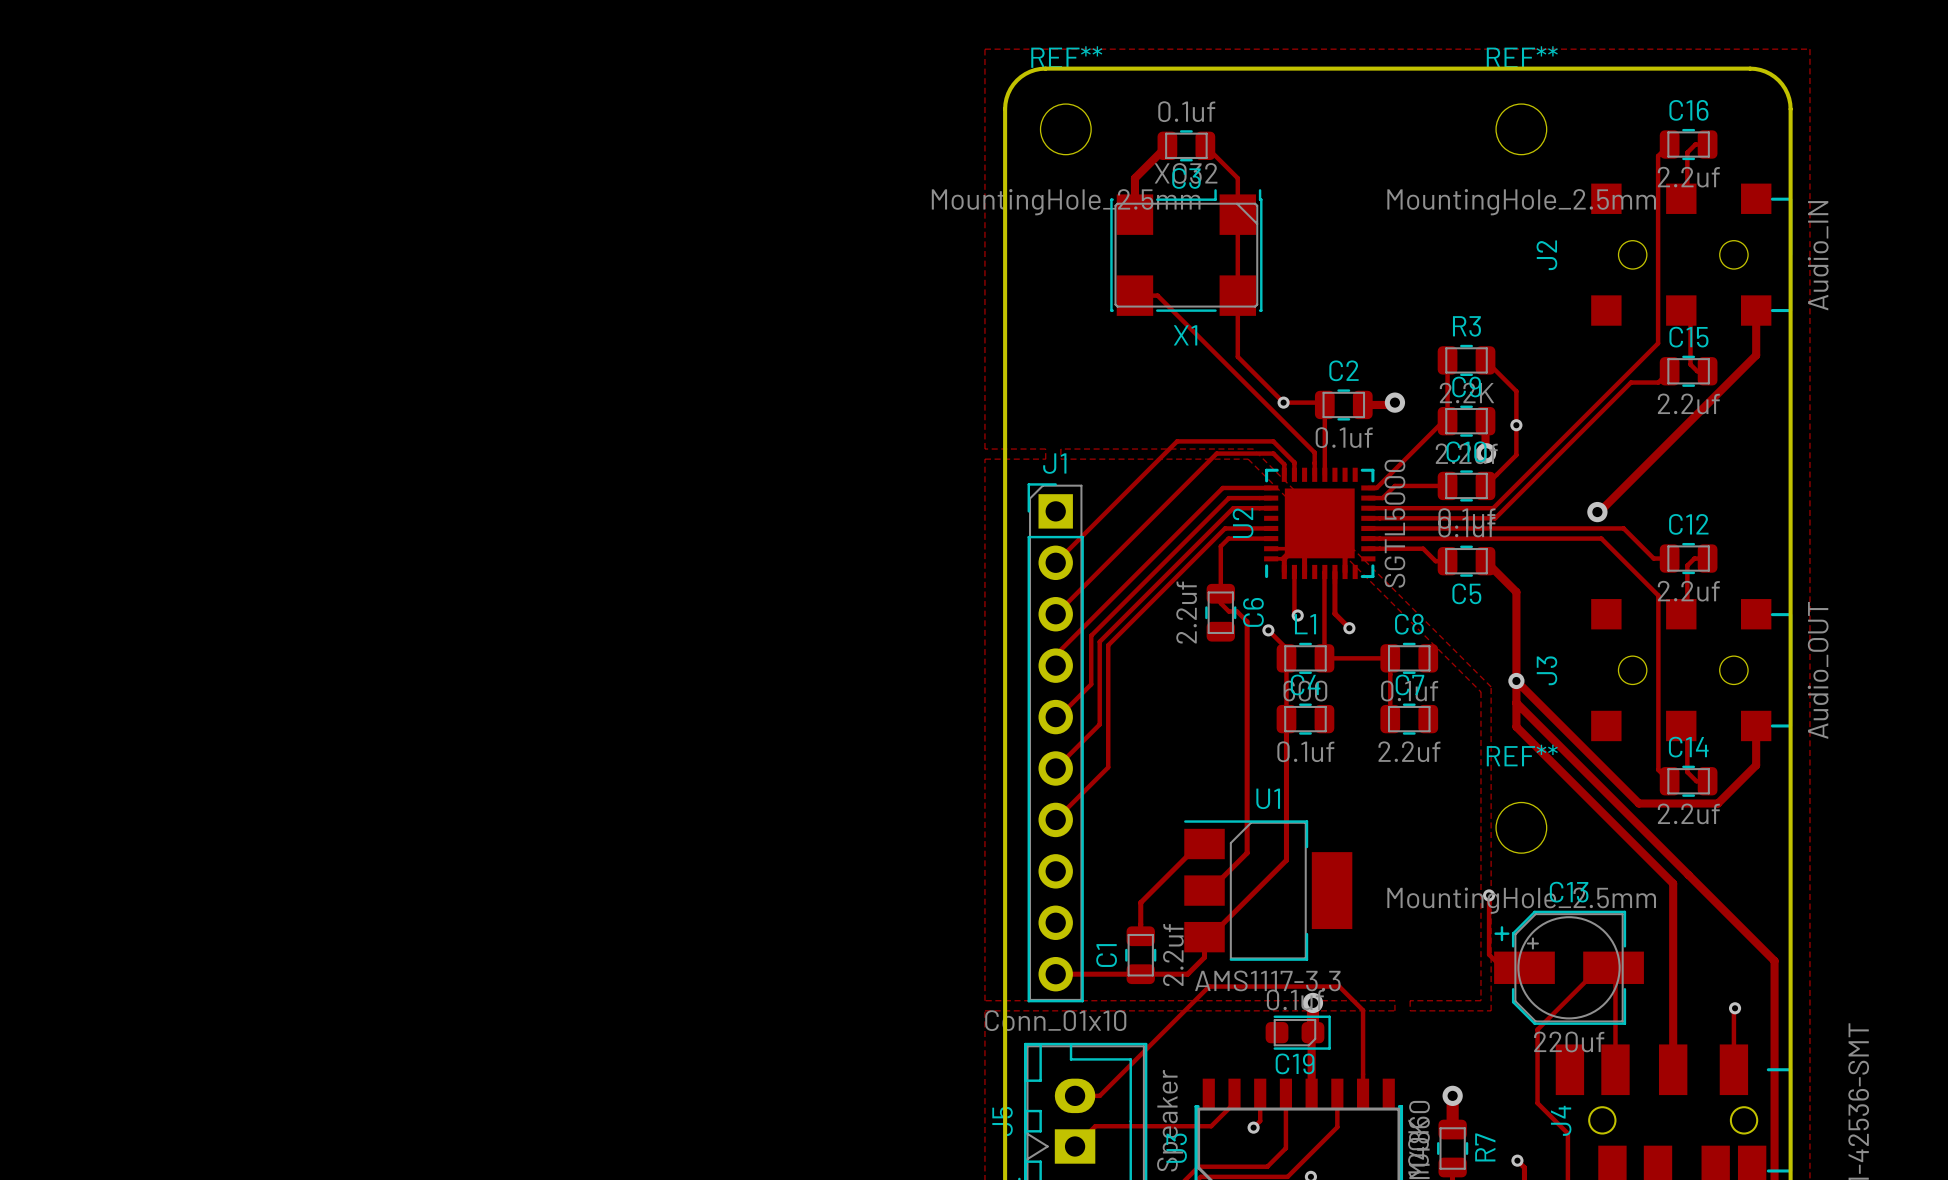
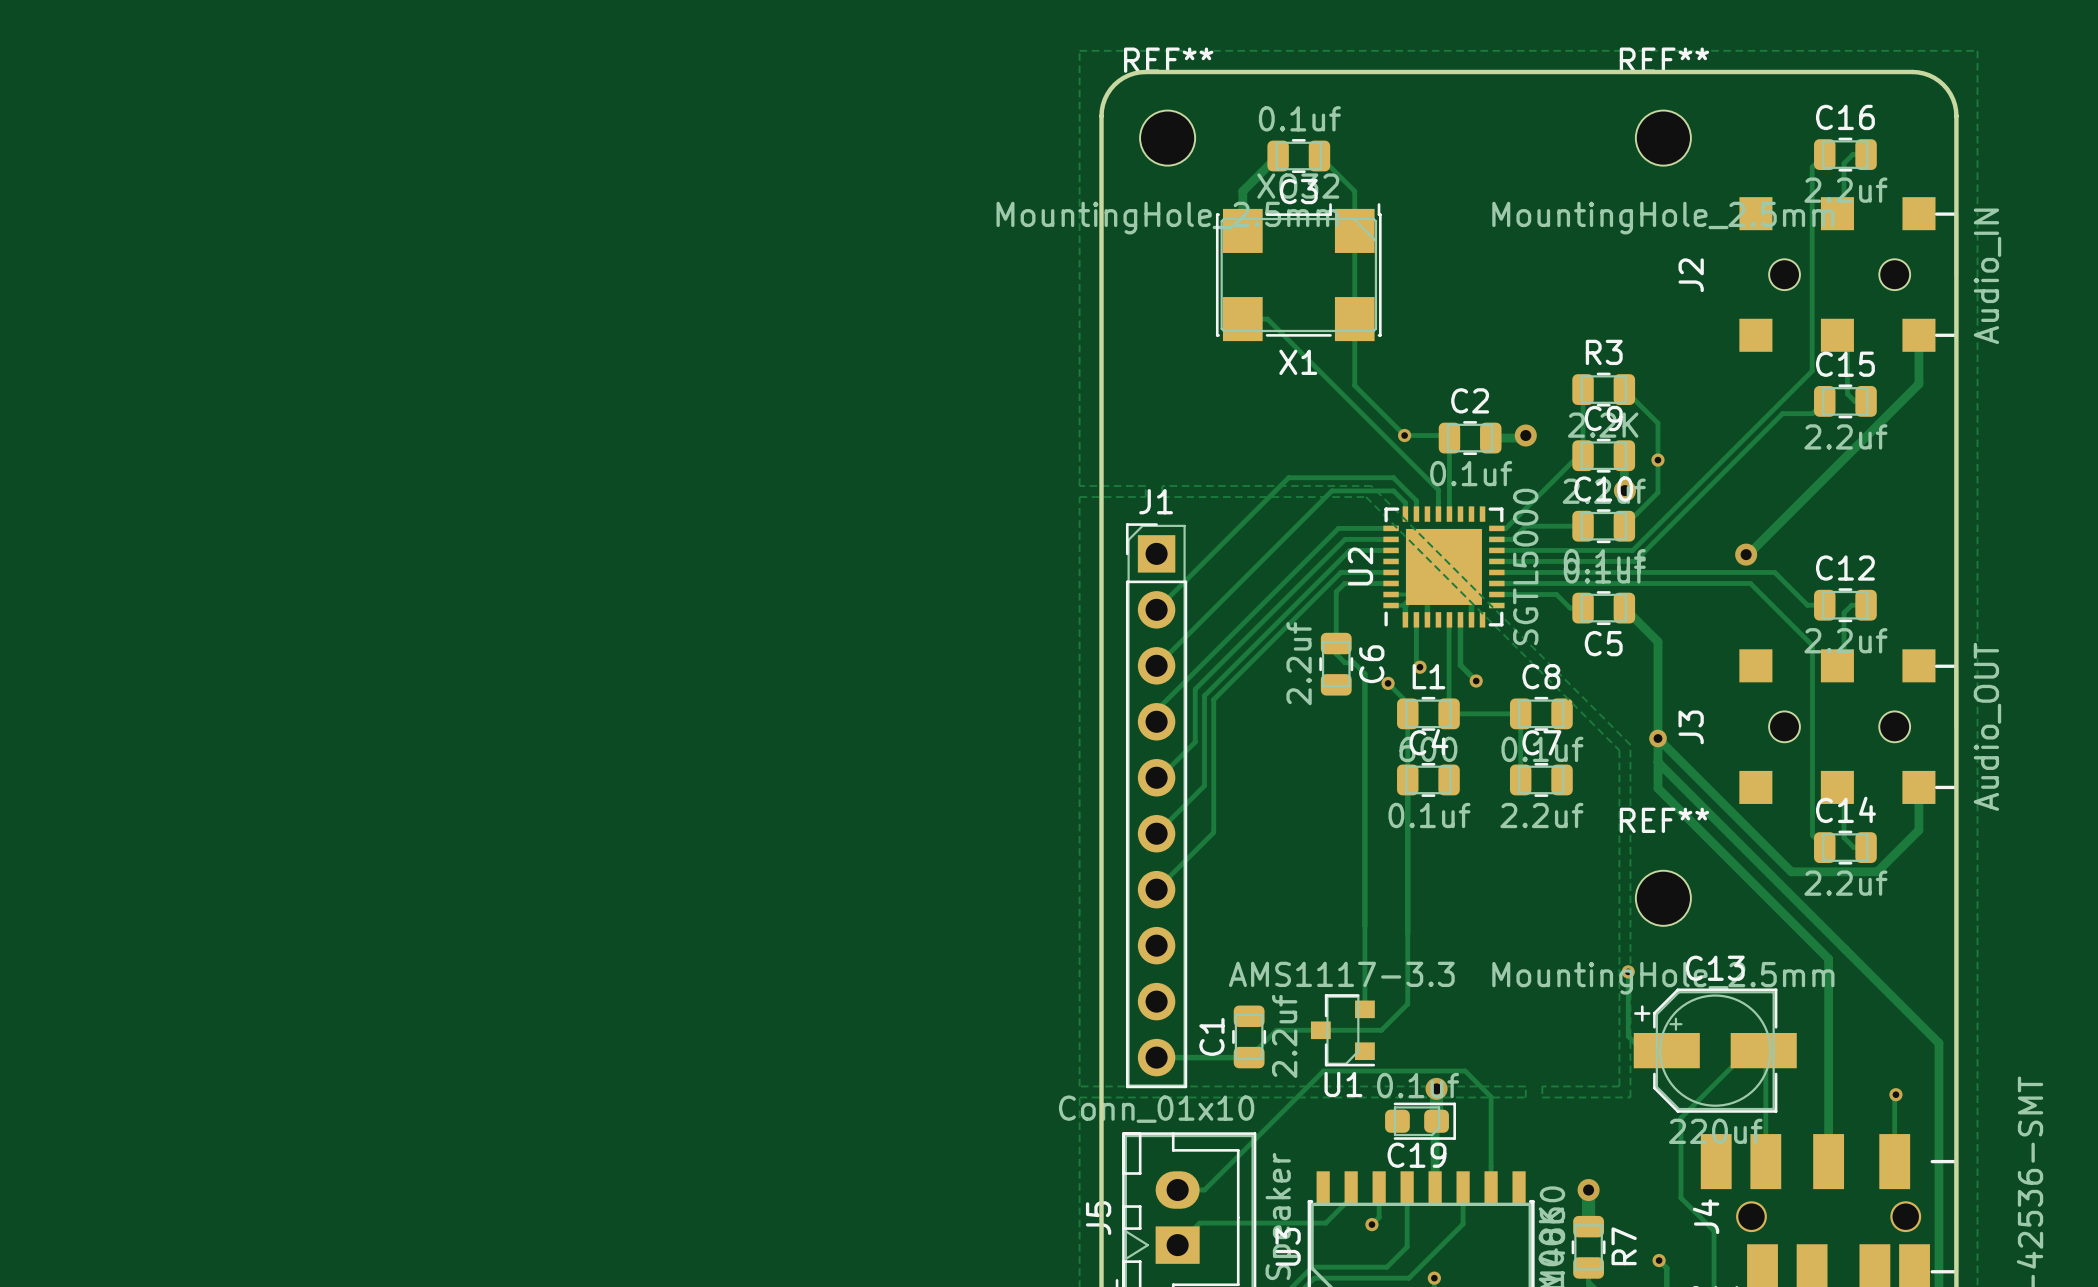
U1 name position: U1 (1268, 798) -> U1 (1343, 1084)
U1 footprint: [1184, 820, 1353, 961] -> [1310, 994, 1376, 1067]
track: (1204, 844) (1199, 844) (1140, 902) (1140, 936) -> none
track: (1247, 853) (1209, 890) (1204, 890) -> (1364, 925) (1364, 1009)
track: (1286, 860) (1209, 937) (1204, 937) (1204, 957) (1187, 974) (1140, 974) -> (1407, 933) (1407, 1003) (1381, 1030) (1276, 1030) (1249, 1057)
U1 value position: AMS1117-3.3 (1267, 980) -> AMS1117-3.3 (1341, 974)

